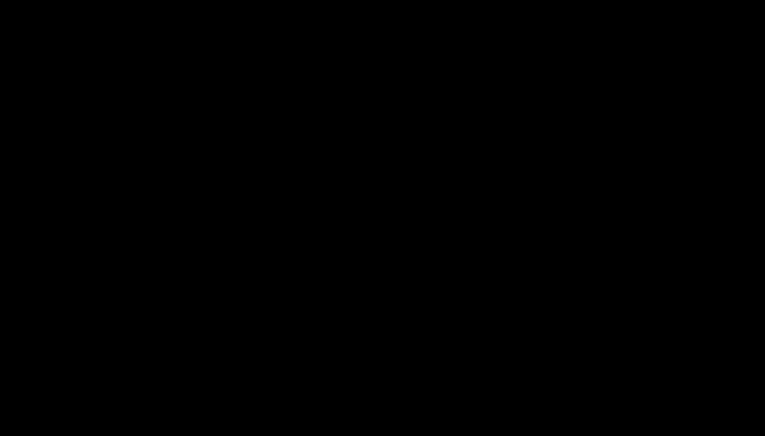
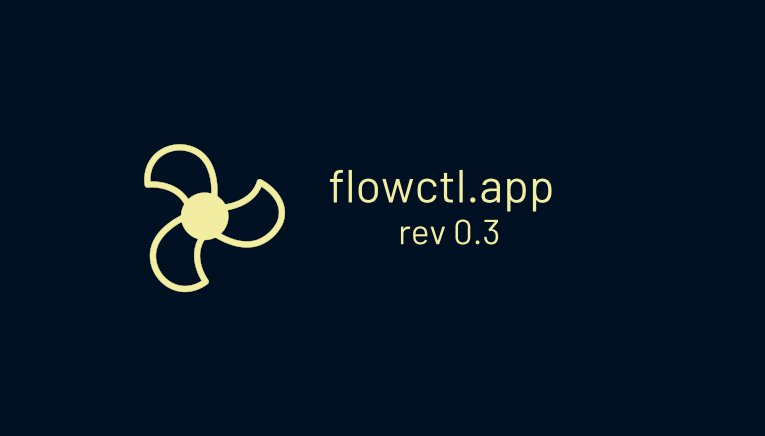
drawing: none -> [144, 144, 286, 293]
text: none -> flowctl.app (440, 190)
text: none -> rev 0.3 (449, 232)

